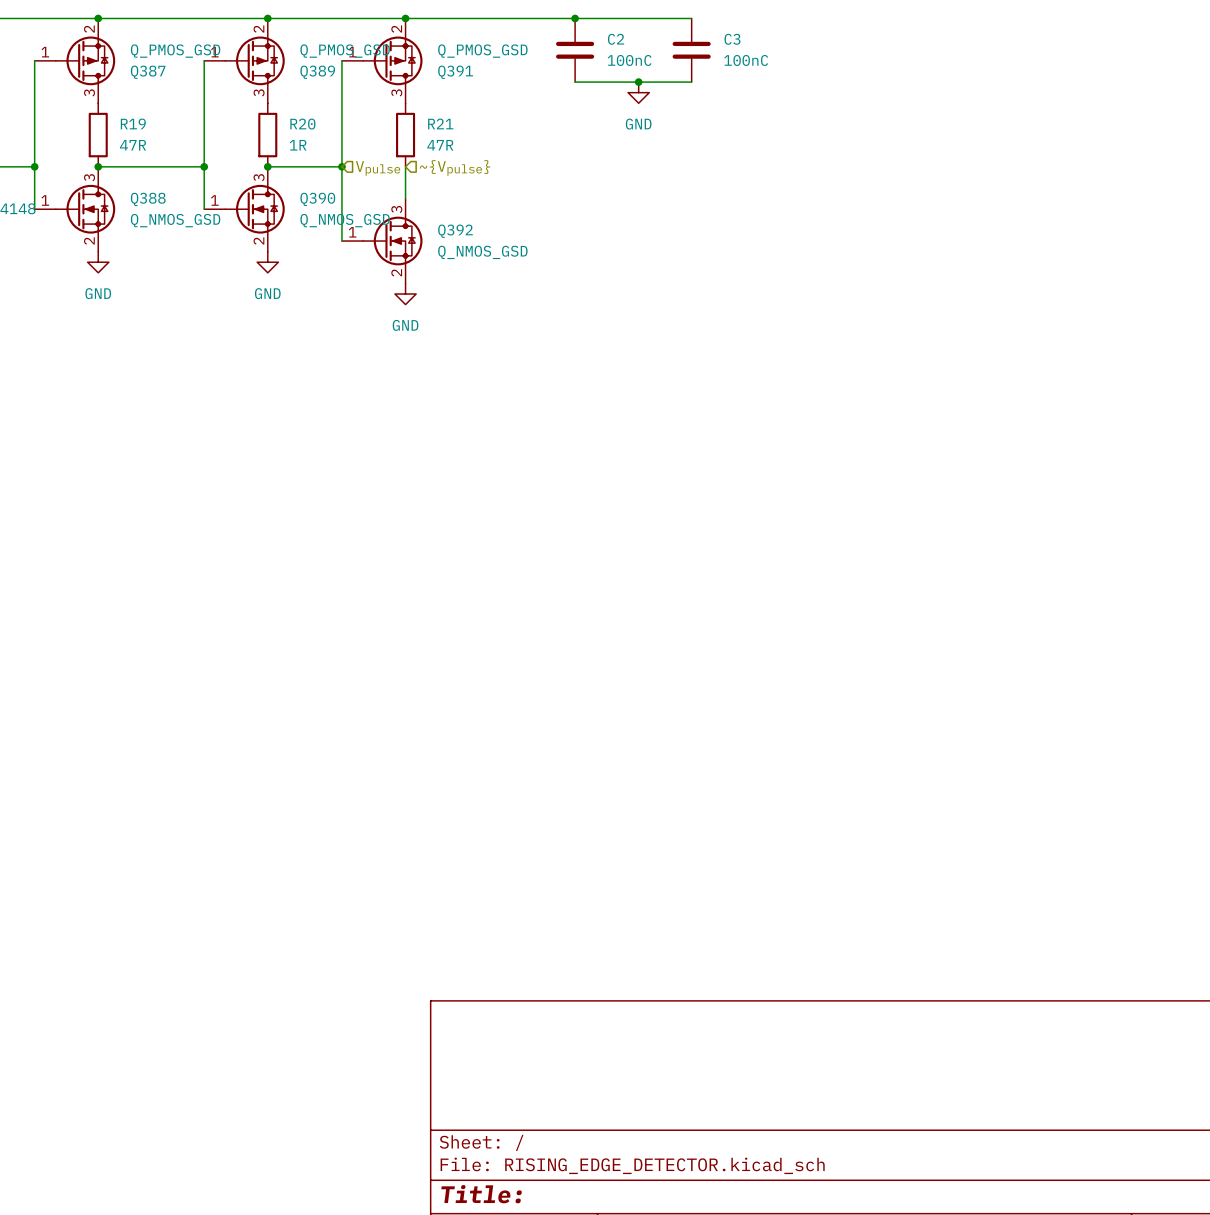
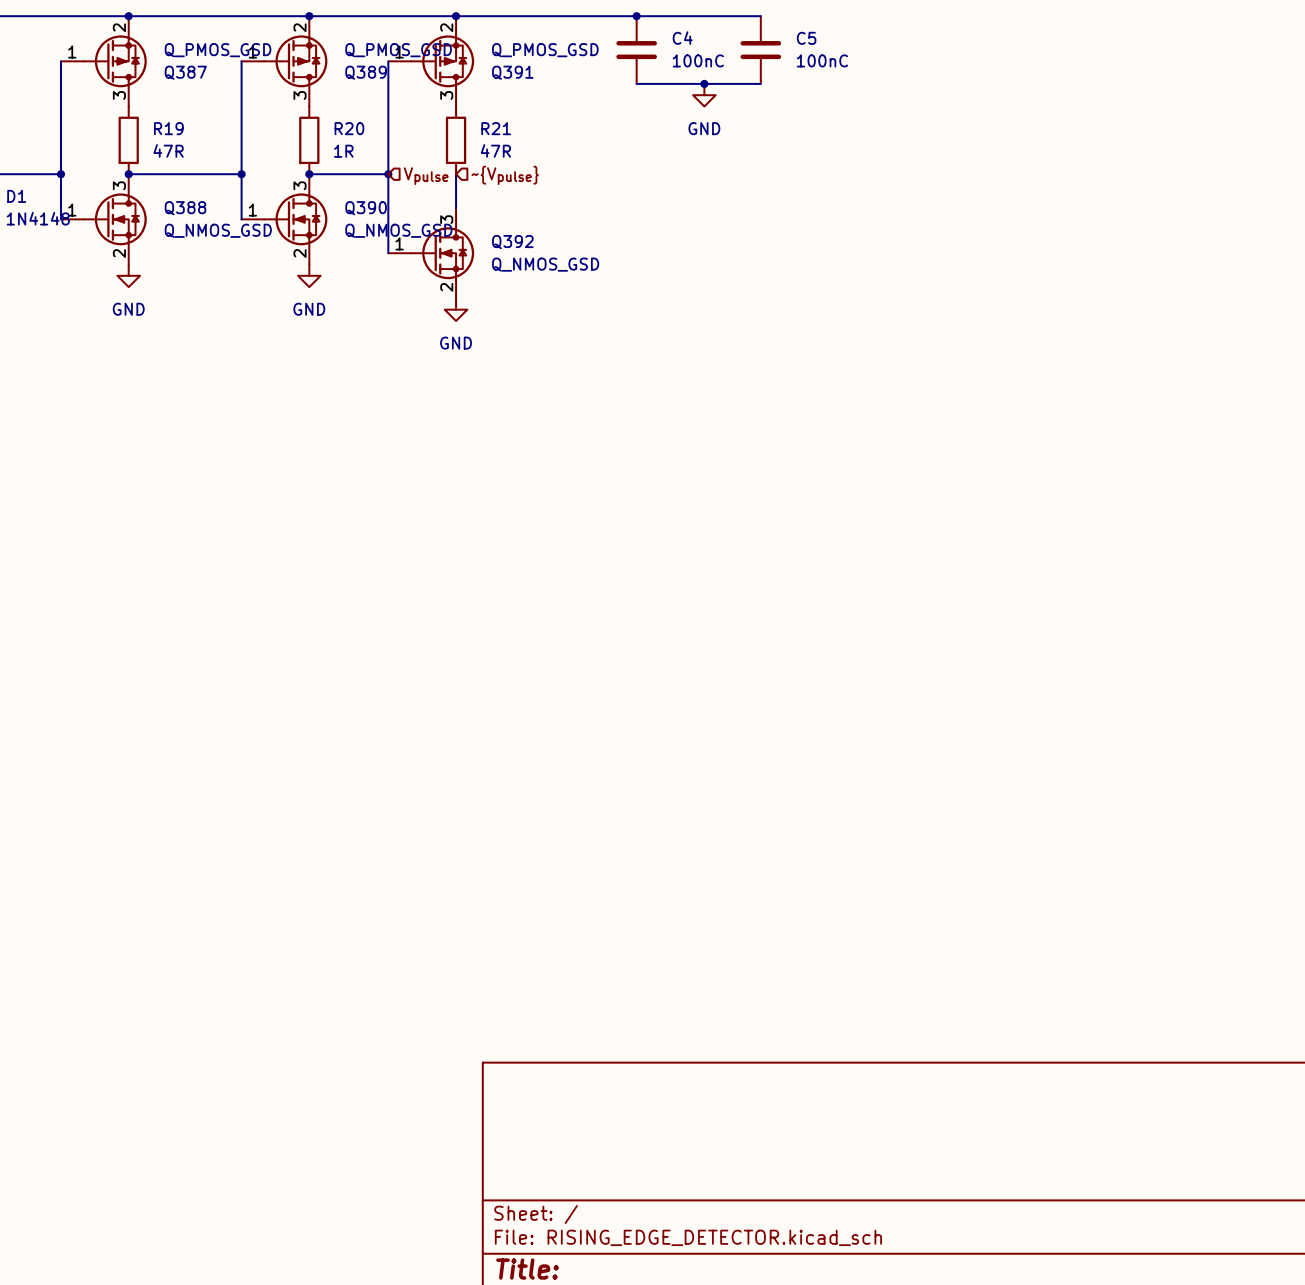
C2 name: C2 (616, 39) -> C4 (682, 38)
C3 name: C3 (732, 39) -> C5 (806, 38)

